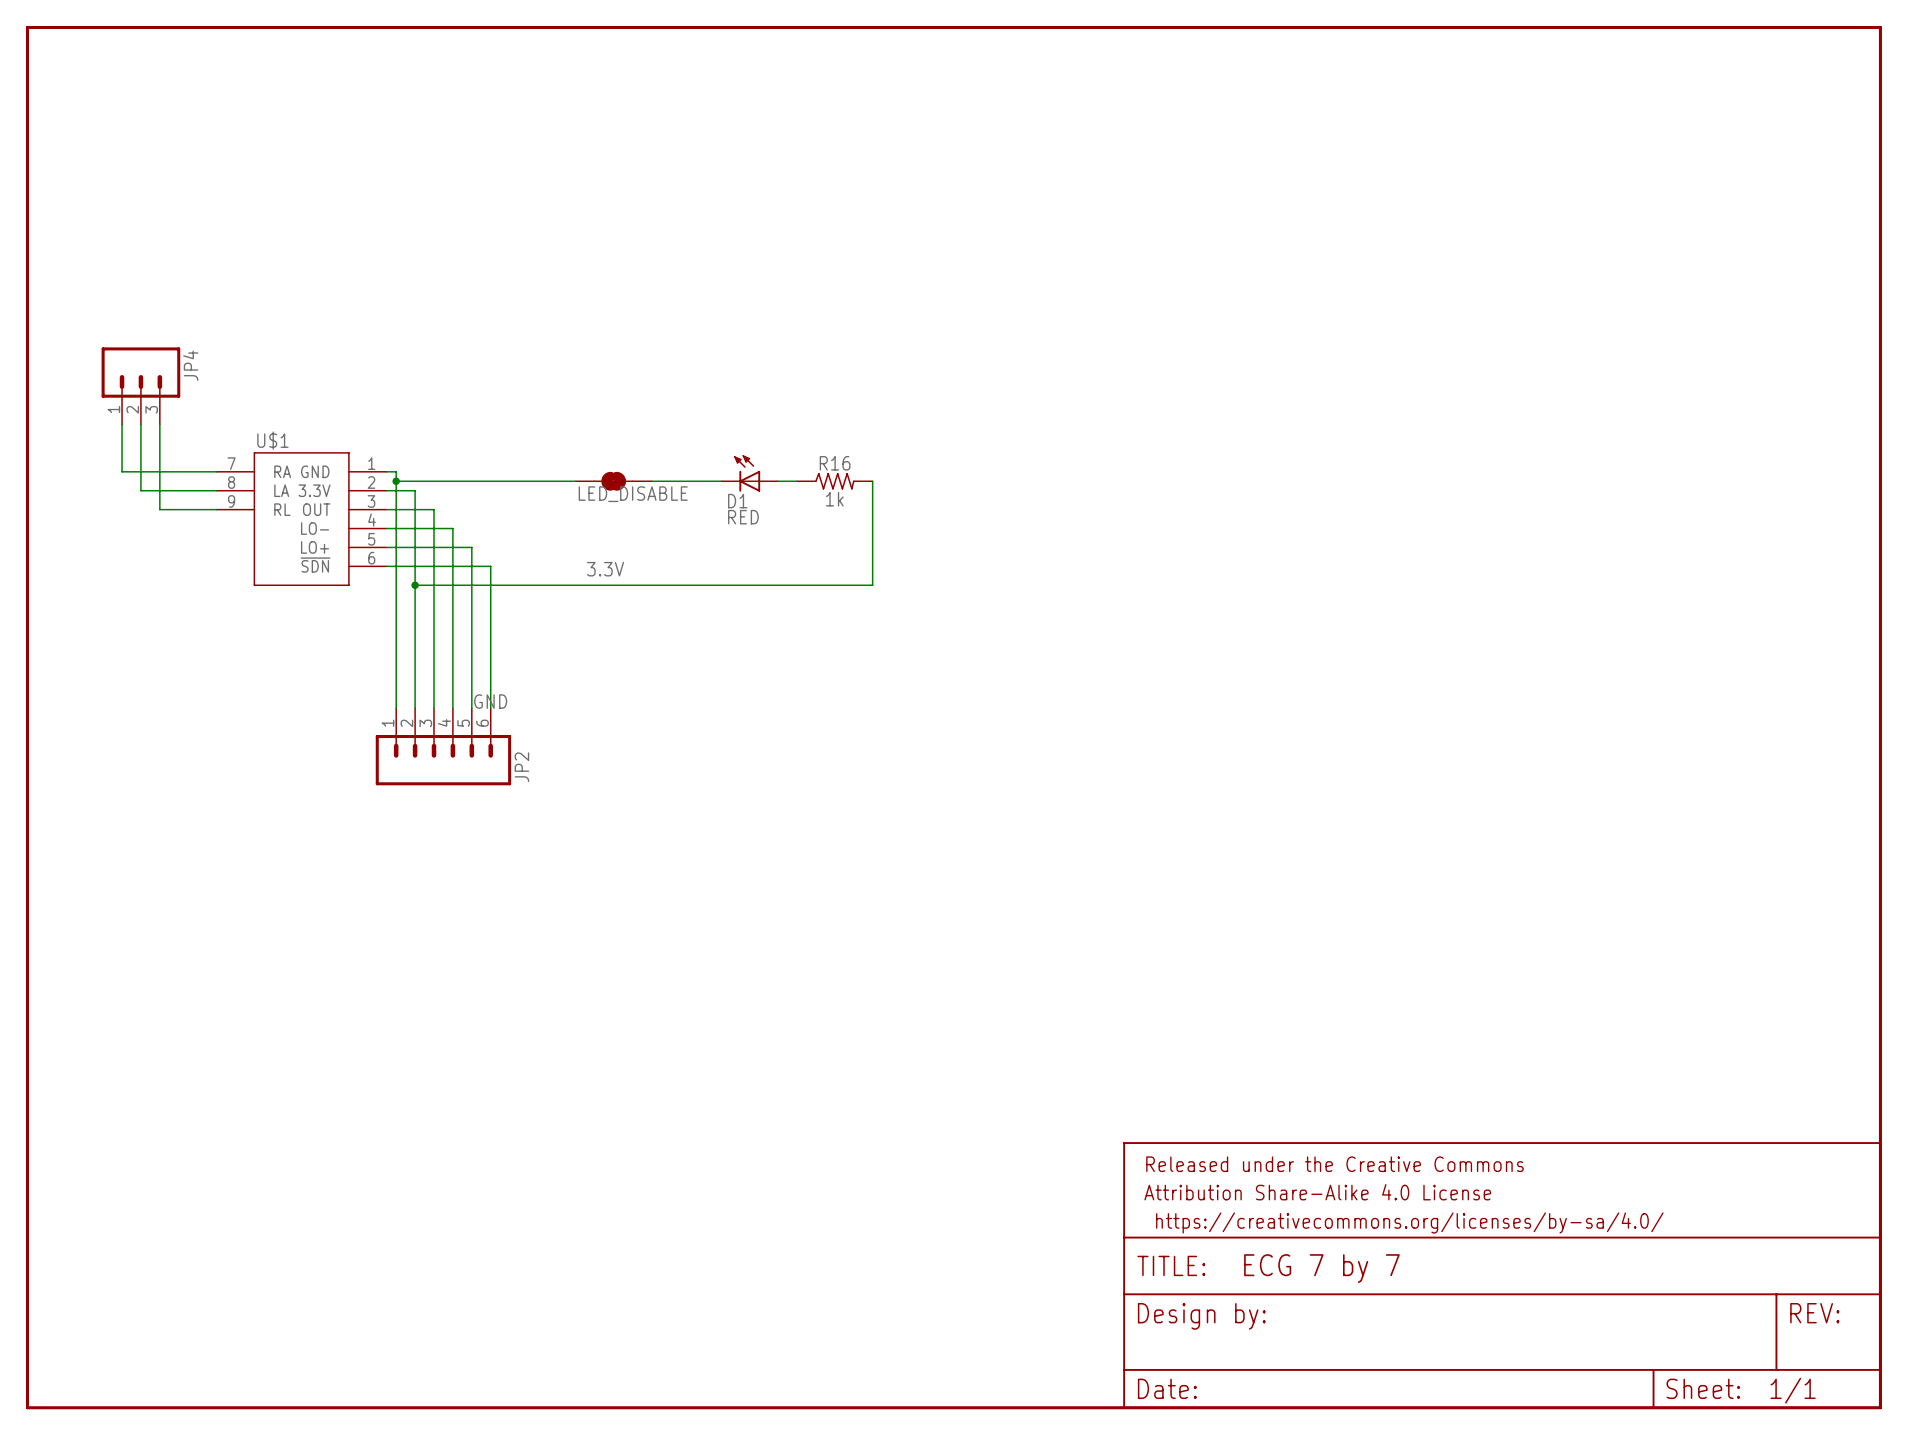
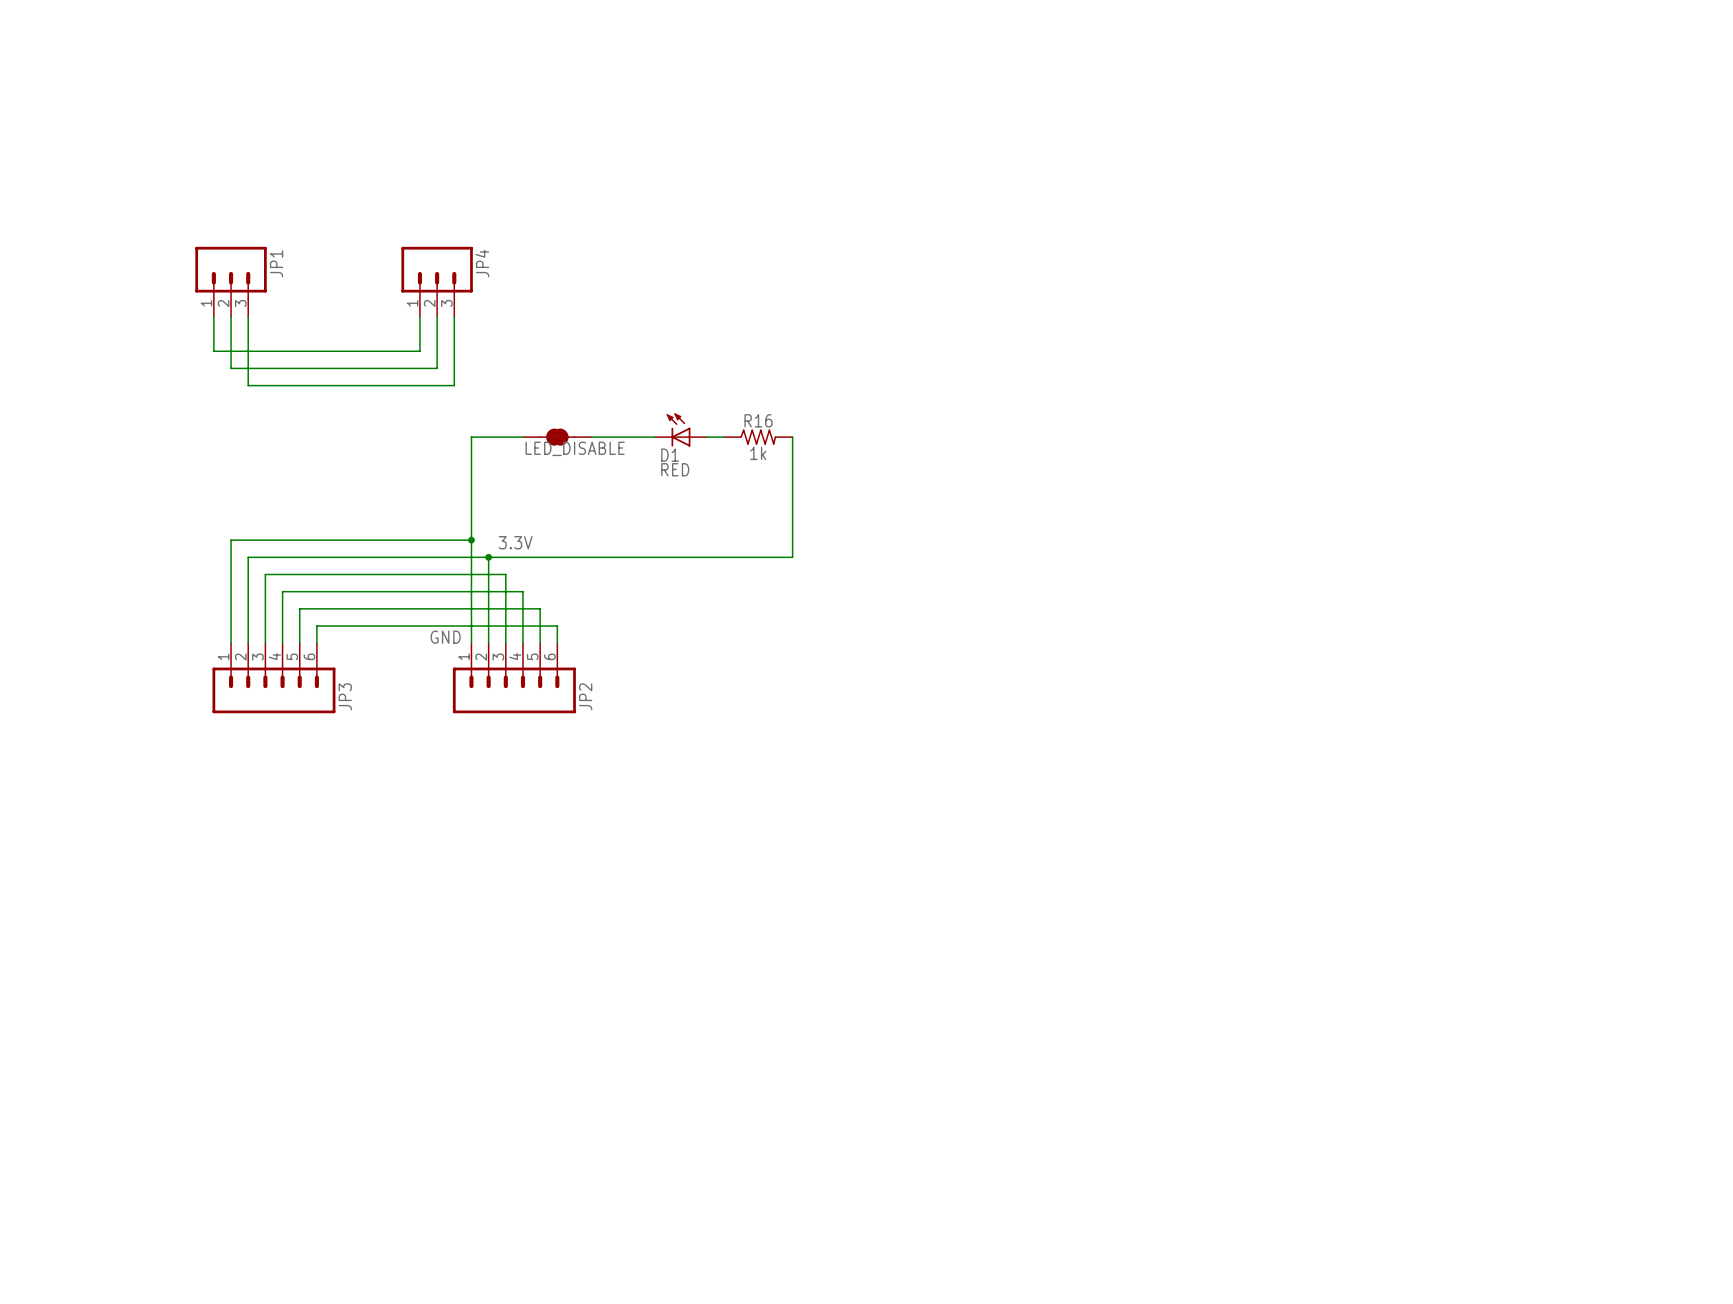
JP1: none -> (231, 281)
wire: none -> (213, 316) (213, 351) (419, 351) (419, 316)
wire: none -> (231, 316) (231, 368) (437, 368) (437, 316)
wire: none -> (248, 316) (248, 385) (454, 385) (454, 316)
JP4 position: (140, 385) -> (437, 281)
wire: (122, 424) (122, 471) (216, 471) -> none
wire: (140, 424) (140, 490) (216, 490) -> none
wire: (159, 424) (159, 509) (216, 509) -> none
wire: (386, 471) (396, 471) (396, 708) -> none
wire: (396, 481) (519, 481) -> (471, 643) (471, 437)
junction: (396, 481) -> none
wire: (386, 490) (415, 490) (415, 708) -> none
wire: (386, 509) (434, 509) (434, 708) -> none
U$1: (301, 519) -> none
wire: (386, 528) (452, 528) (452, 708) -> none
wire: (386, 547) (471, 547) (471, 708) -> none
wire: (386, 566) (490, 566) (490, 708) -> none
label position: 3.3V (605, 569) -> 3.3V (515, 542)
wire: (415, 585) (872, 585) -> (248, 643) (248, 557) (792, 557) (792, 531)
junction: (415, 585) -> none
wire: none -> (471, 540) (231, 540) (231, 643)
junction: none -> (471, 540)
wire: none -> (488, 557) (488, 643)
junction: none -> (488, 557)
wire: none -> (265, 643) (265, 574) (505, 574) (505, 643)
wire: none -> (282, 643) (282, 591) (522, 591) (522, 643)
wire: none -> (299, 643) (299, 608) (540, 608) (540, 643)
wire: none -> (316, 643) (316, 626) (557, 626) (557, 643)
part: (953, 717) -> none
JP3: none -> (273, 678)
JP2 position: (443, 746) -> (514, 678)
part: (1502, 1275) -> none

